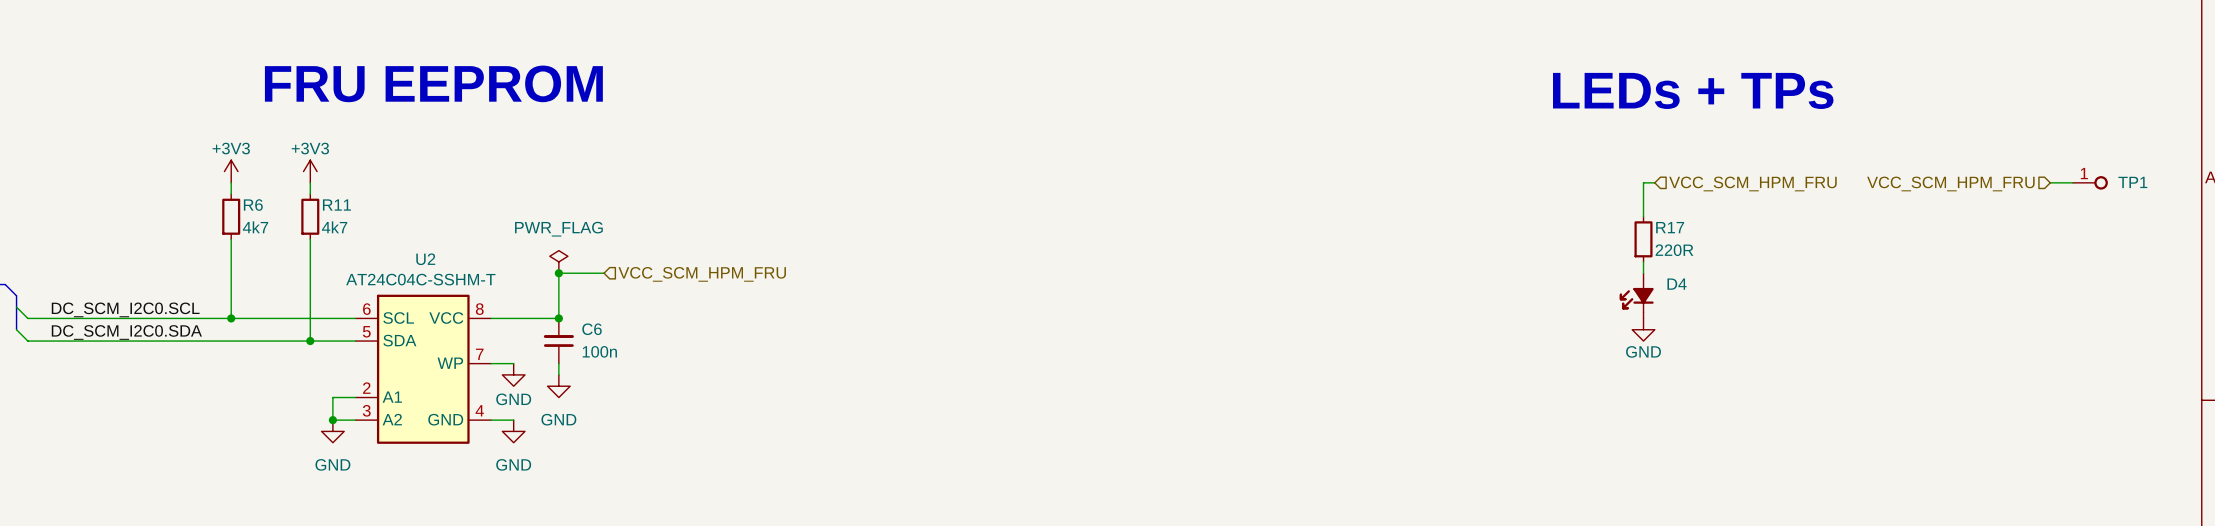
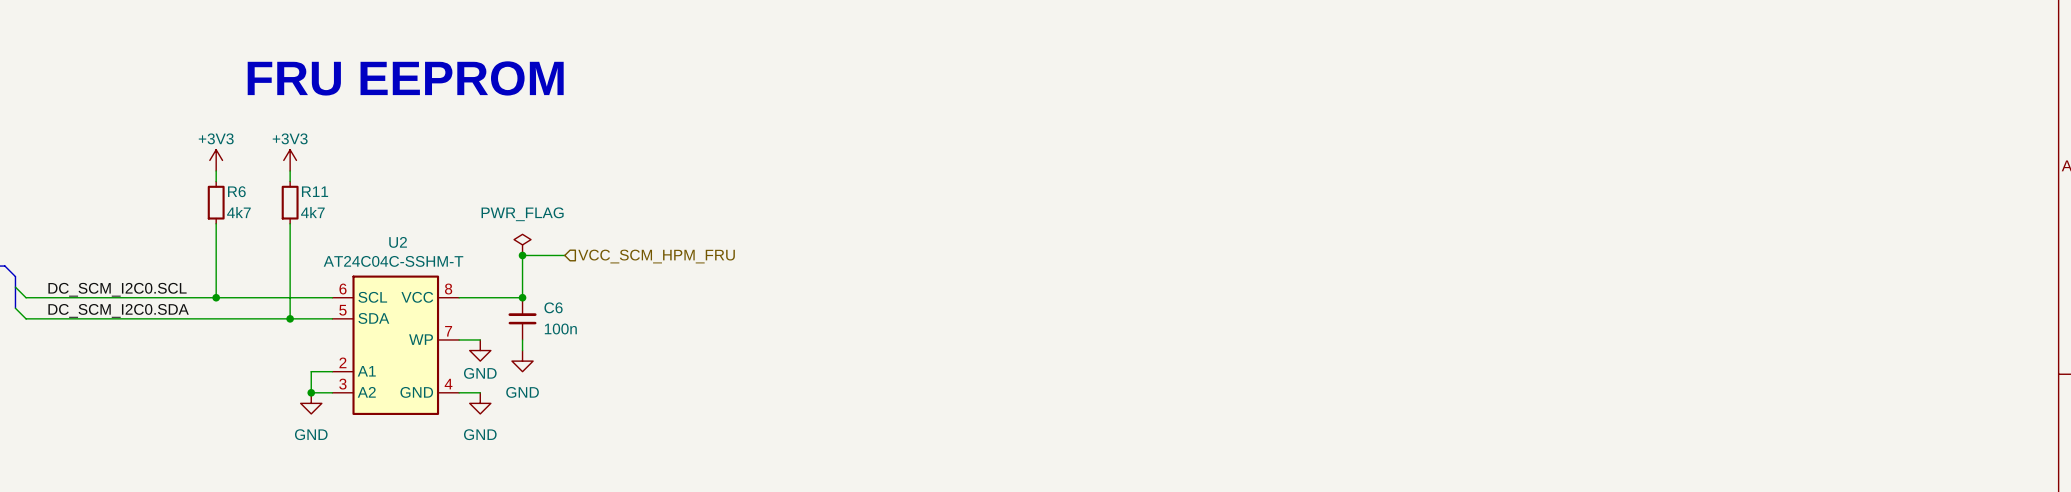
text: LEDs + TPs (1693, 90) -> none
wire: (1654, 182) (1643, 182) (1643, 216) -> none
wire: (2050, 182) (2072, 182) -> none
TP1: (2090, 182) -> none
hierarchical label: VCC_SCM_HPM_FRU (1752, 183) -> none
hierarchical label: VCC_SCM_HPM_FRU (1950, 183) -> none
R17: (1643, 239) -> none
wire: (1643, 261) (1643, 273) -> none
D4: (1636, 295) -> none
power symbol: GND (1643, 329) -> none

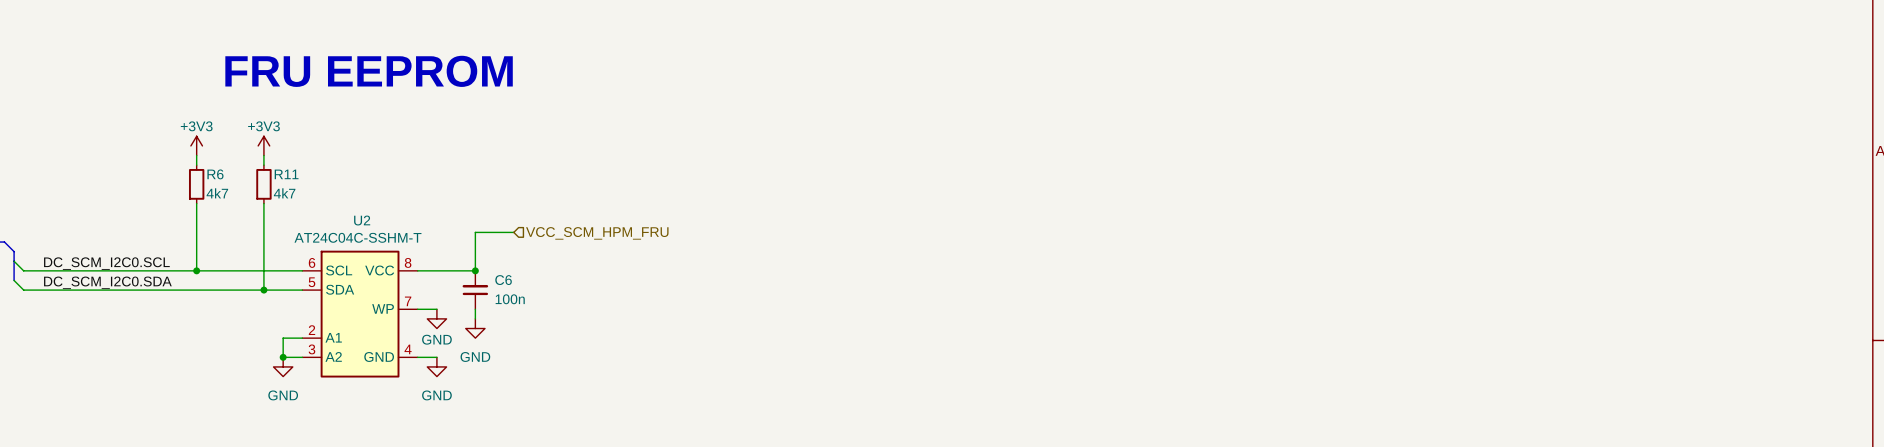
power symbol: PWR_FLAG (522, 244) -> none
junction: (522, 255) -> none

